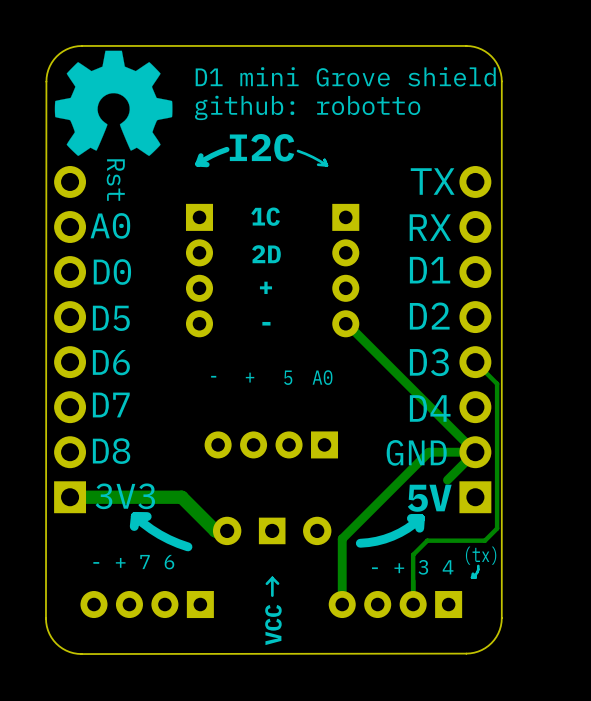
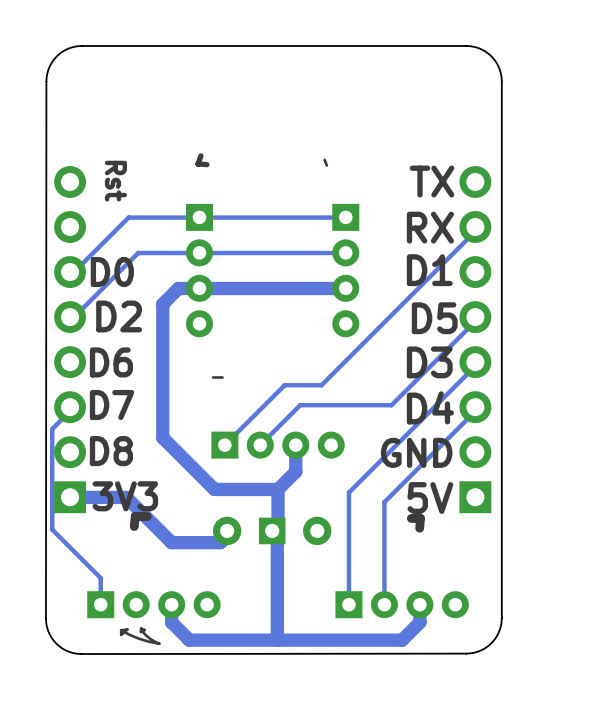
drawing: [54, 50, 173, 156] -> none
text: D1 mini Grove shield (345, 76) -> none
text: github: robotto (307, 107) -> none
text: I2C (262, 147) -> none
line: (226, 149) (197, 164) -> none
line: (298, 151) (326, 165) (318, 164) -> none
text: 1C (265, 216) -> none
track: none -> (349, 217) (128, 217) (73, 272)
text: A0 (110, 225) -> none
track: none -> (479, 227) (321, 385) (284, 385) (224, 445)
track: none -> (349, 253) (138, 253) (73, 317)
text: 2D (266, 254) -> none
text: + (265, 287) -> none
track: none -> (349, 288) (178, 288) (162, 304) (162, 437) (214, 489) (278, 489)
text position: D2 (429, 316) -> D2 (119, 316)
track: none -> (479, 317) (391, 405) (300, 405) (260, 445)
text position: D5 (111, 318) -> D5 (434, 318)
text: - (266, 323) -> none
track: (345, 323) (475, 452) -> none
track: (475, 362) (497, 383) (497, 528) (484, 540) (427, 540) (413, 554) (413, 604) -> none
track: none -> (479, 362) (348, 492) (348, 604)
text: + (250, 377) -> none
text: 5 (288, 377) -> none
text: A0 (322, 377) -> none
track: none -> (73, 407) (52, 429) (52, 529) (100, 578) (100, 604)
track: none -> (479, 407) (384, 502) (384, 604)
part side: bottom (271, 444) -> top (278, 445)
track: none -> (295, 445) (295, 471) (278, 489)
track: (475, 452) (428, 452) (342, 538) (342, 604) -> none
track: (475, 452) (447, 480) -> none
track: none -> (278, 489) (277, 531)
track: (70, 497) (181, 497) (215, 530) (227, 530) -> none
track: none -> (73, 497) (126, 497) (171, 542) (220, 542) (232, 531)
line: (135, 516) (159, 534) (187, 546) -> none
line: (420, 518) (392, 536) (360, 543) -> none
track: none -> (277, 531) (278, 640)
text: (tx) (481, 555) -> none
text: - + 7 6 (133, 562) -> none
line: (478, 565) (477, 572) (472, 577) -> none
text: - + 3 4 (412, 567) -> none
line: (272, 577) (278, 583) -> none
line: (272, 577) (272, 595) -> none
line: (272, 577) (266, 583) -> none
line: (472, 577) (473, 573) (475, 577) (472, 577) -> none
part side: bottom (147, 604) -> top (153, 604)
part side: bottom (395, 604) -> top (402, 604)
track: none -> (419, 604) (419, 622) (402, 640) (189, 640) (171, 622) (171, 604)
text: VCC (273, 625) -> none
line: none -> (141, 628) (144, 630) (140, 631) (141, 628)
line: none -> (121, 630) (127, 629) (121, 634) (121, 630)
line: none -> (121, 630) (139, 638) (159, 643) (142, 631)

